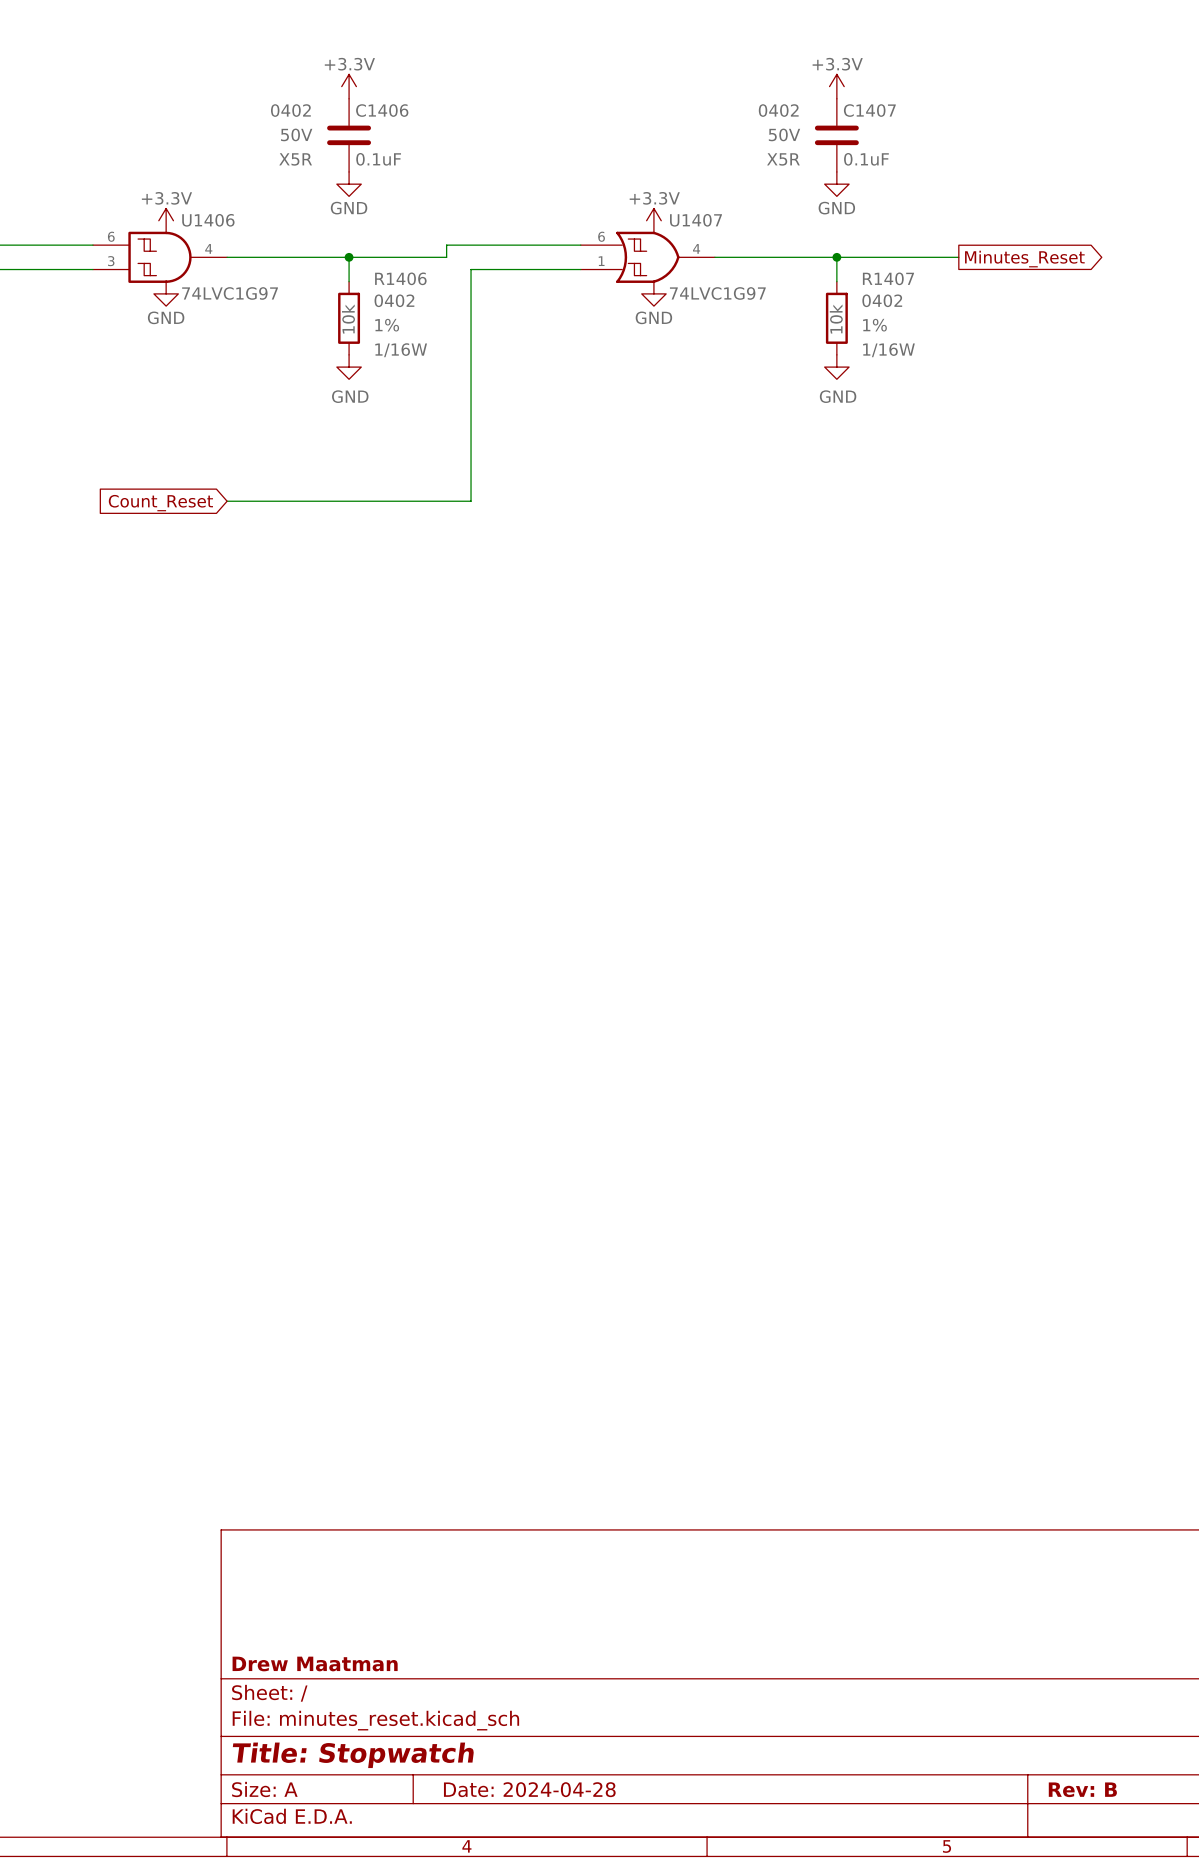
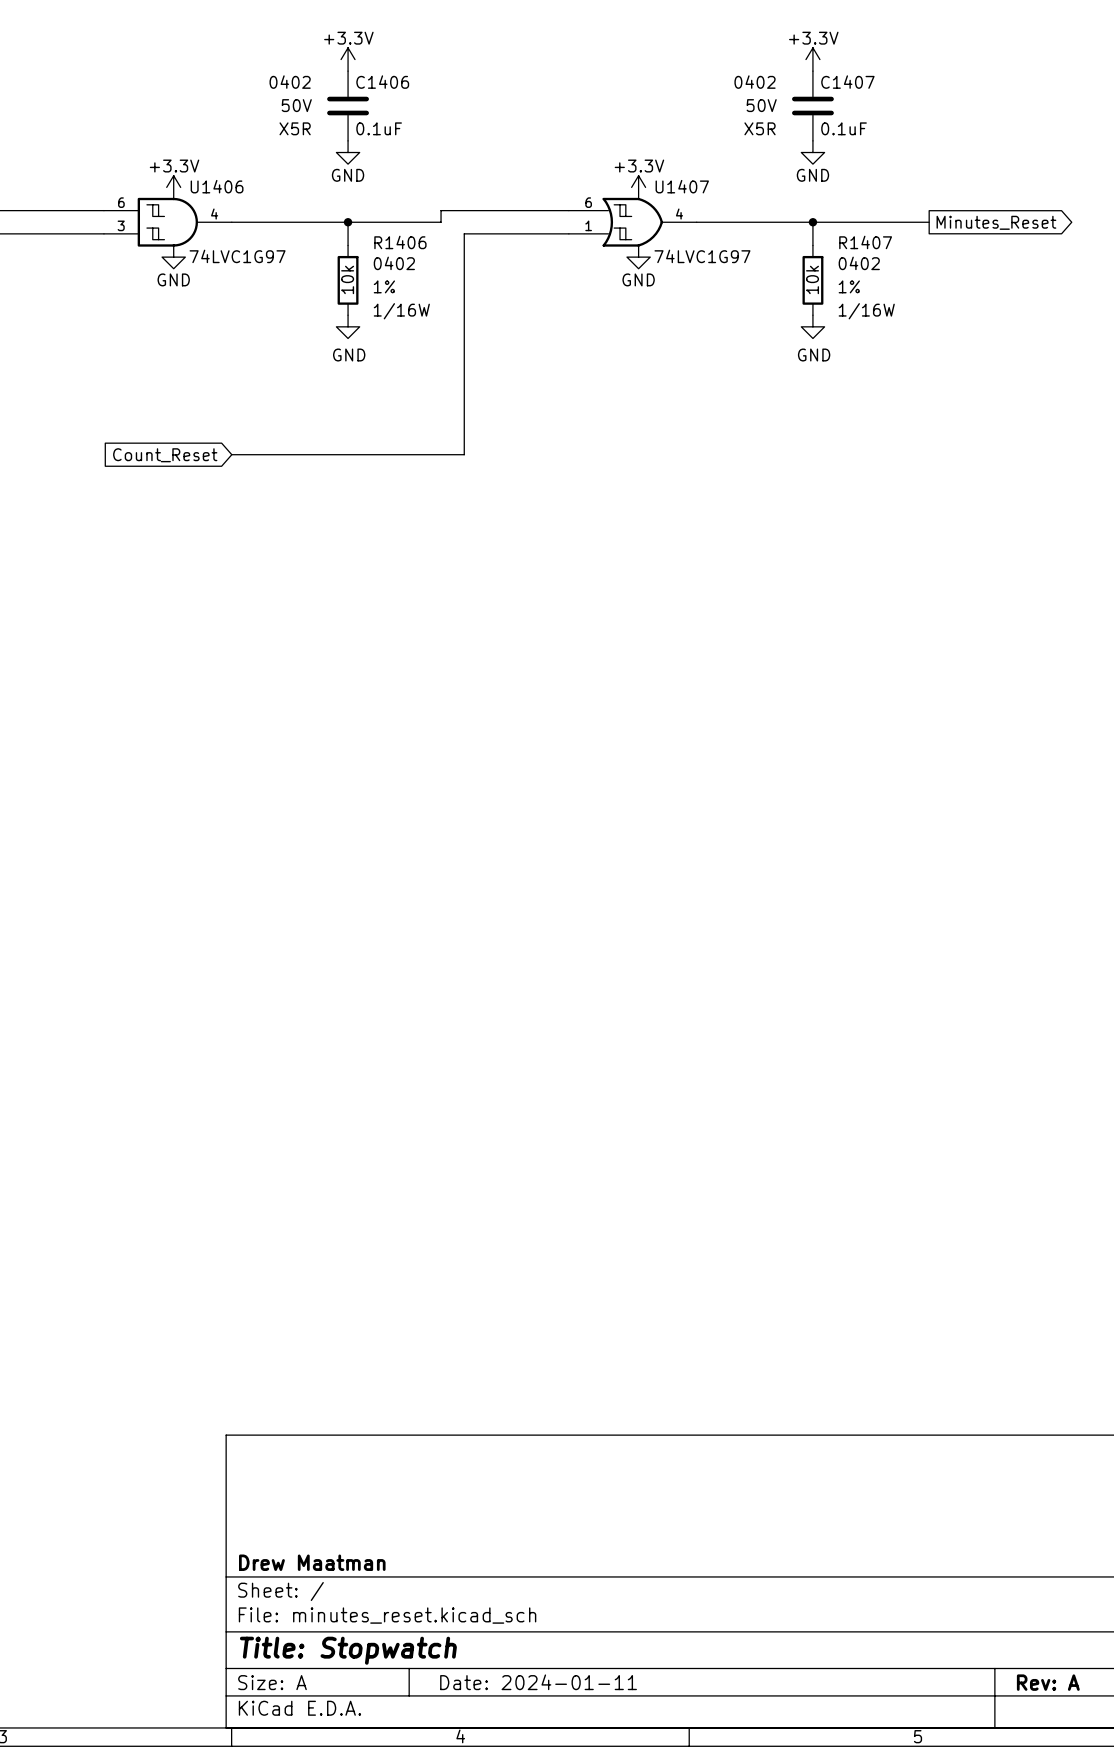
title block: Date: 2024-04-28 (529, 1789) -> Date: 2024-01-11 (538, 1682)
title block: Rev: B (1082, 1789) -> Rev: A (1048, 1682)

